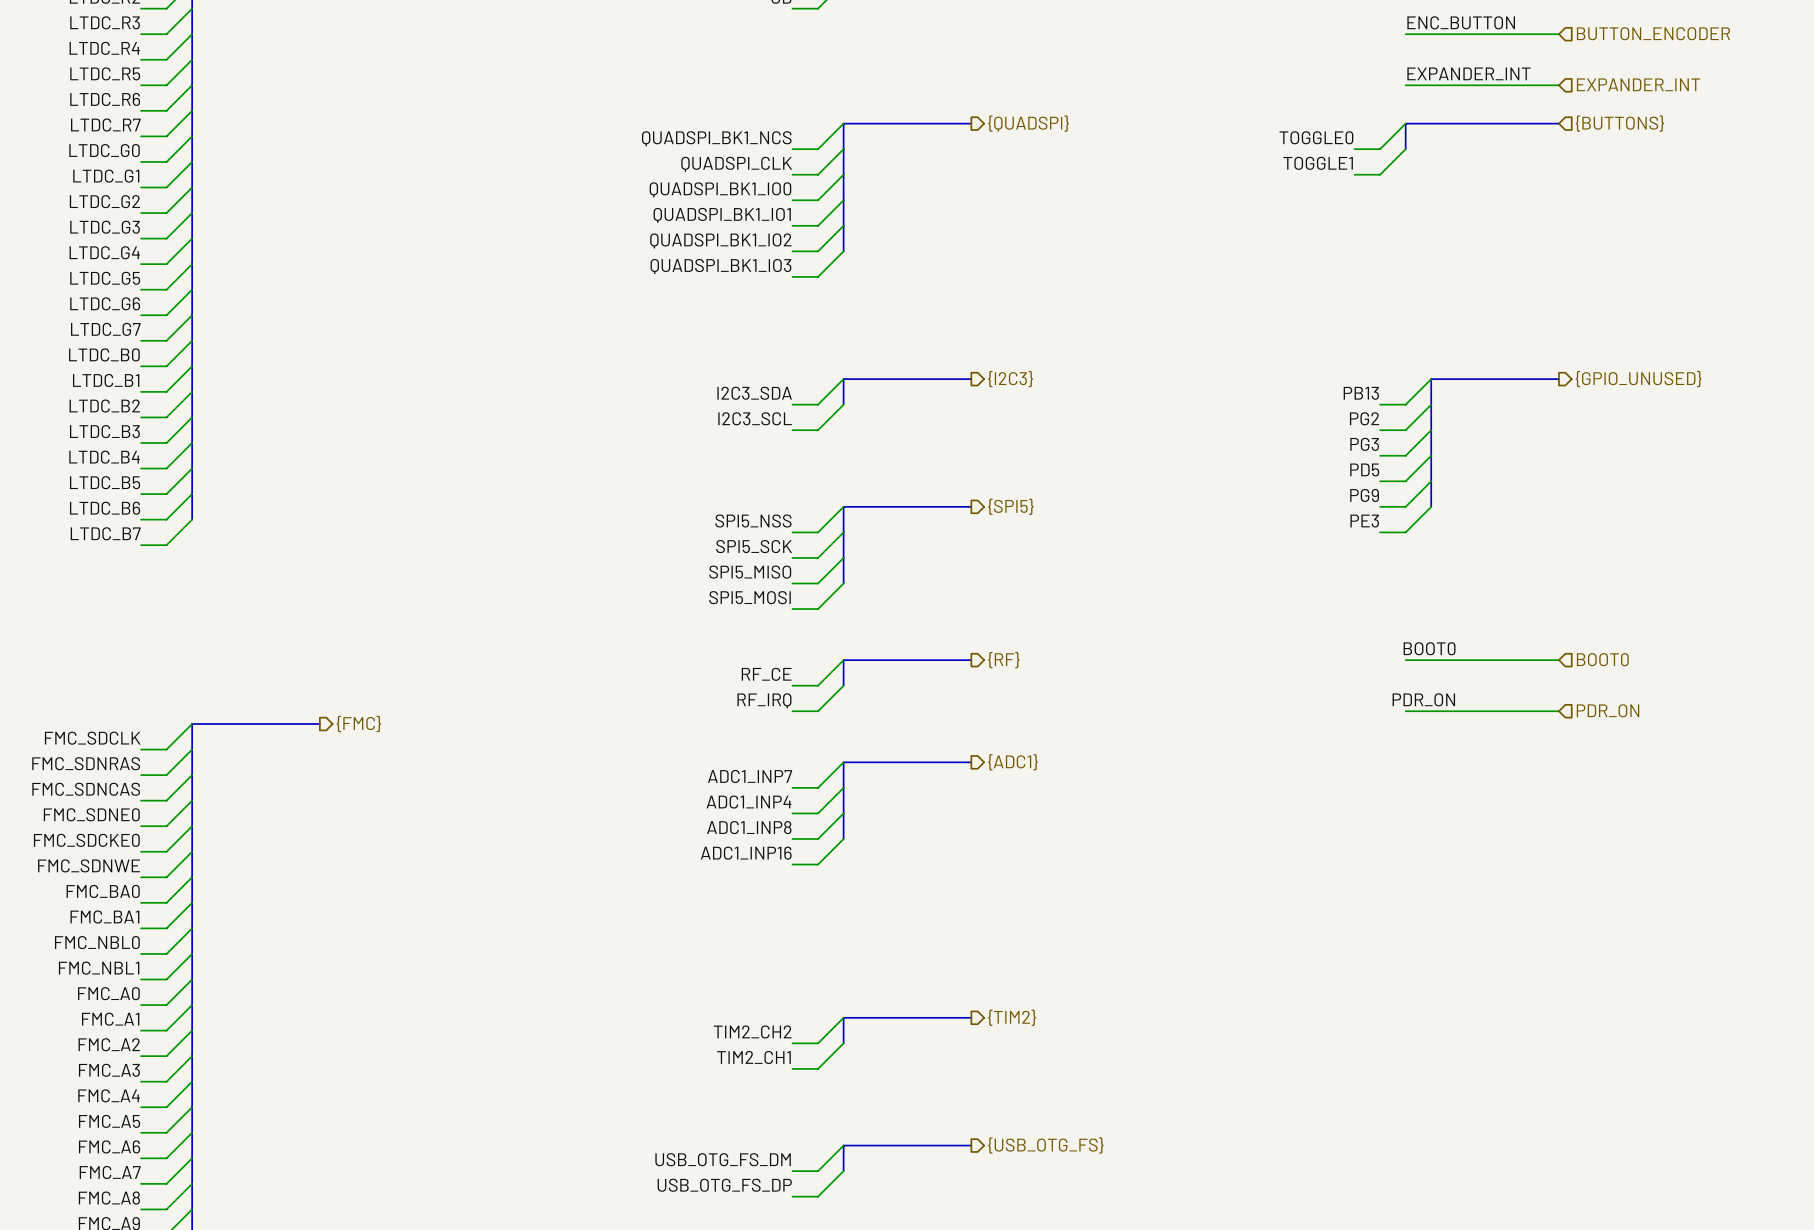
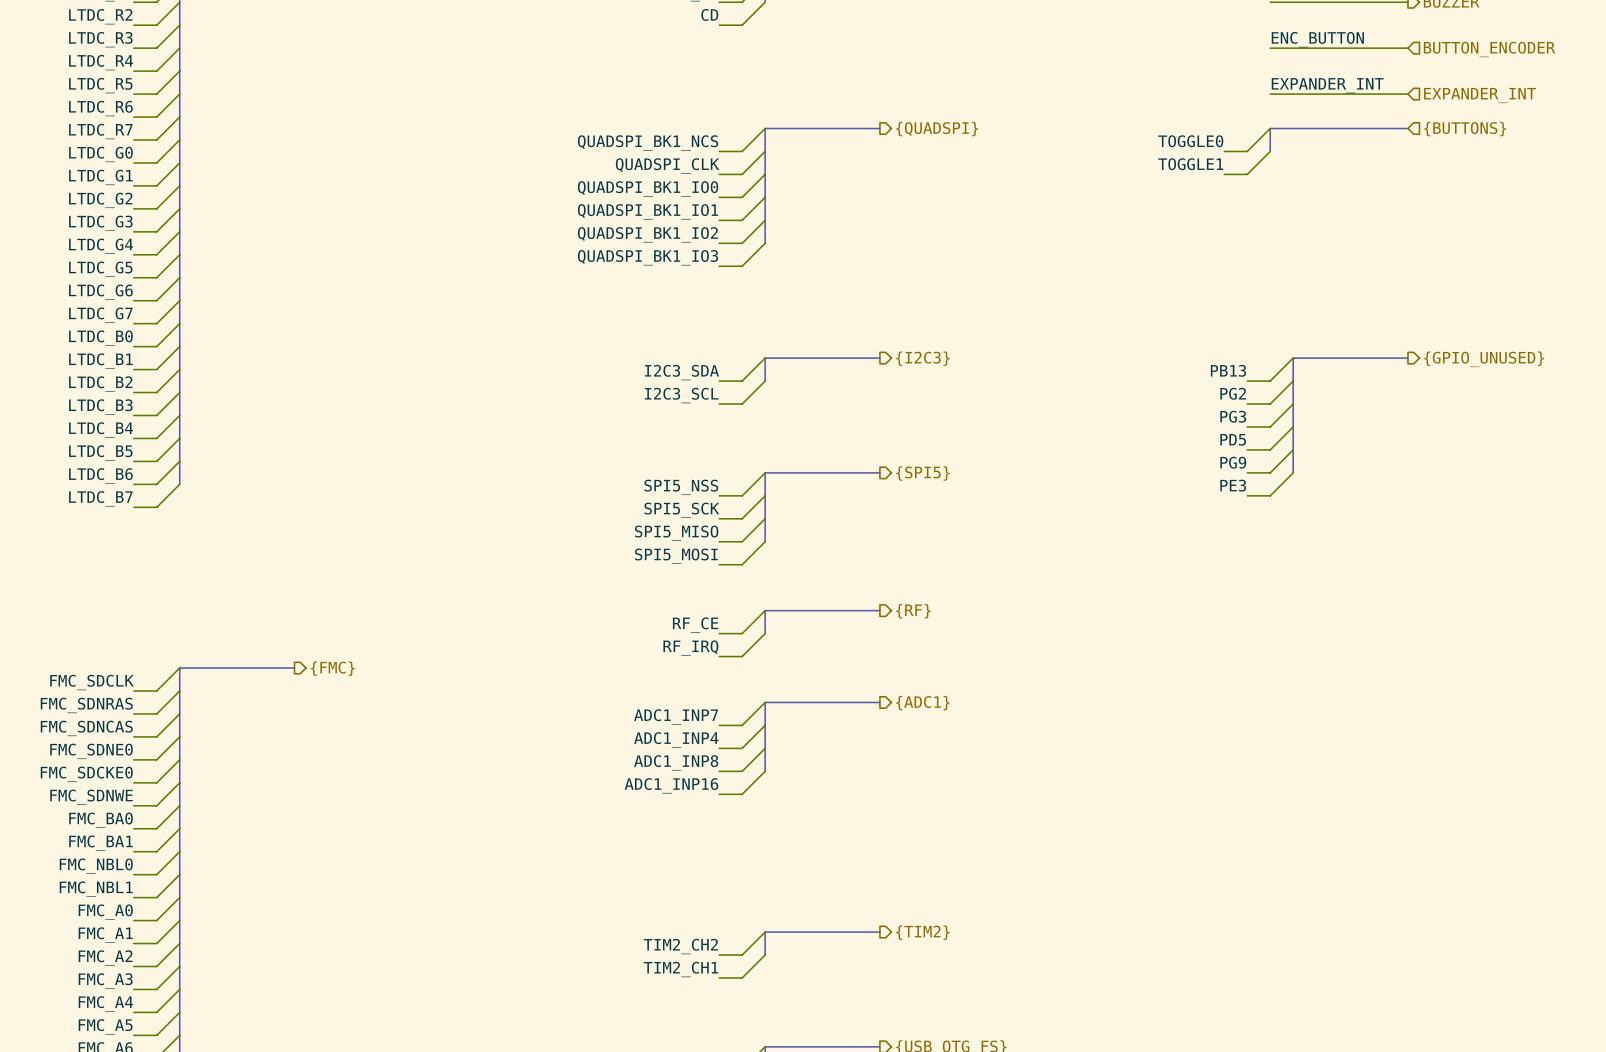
label: BOOT0 (1429, 648) -> none
hierarchical label: BOOT0 (1602, 659) -> none
wire: (1405, 660) (1558, 660) -> none
label: PDR_ON (1423, 699) -> none
hierarchical label: PDR_ON (1608, 710) -> none
wire: (1405, 711) (1558, 711) -> none

